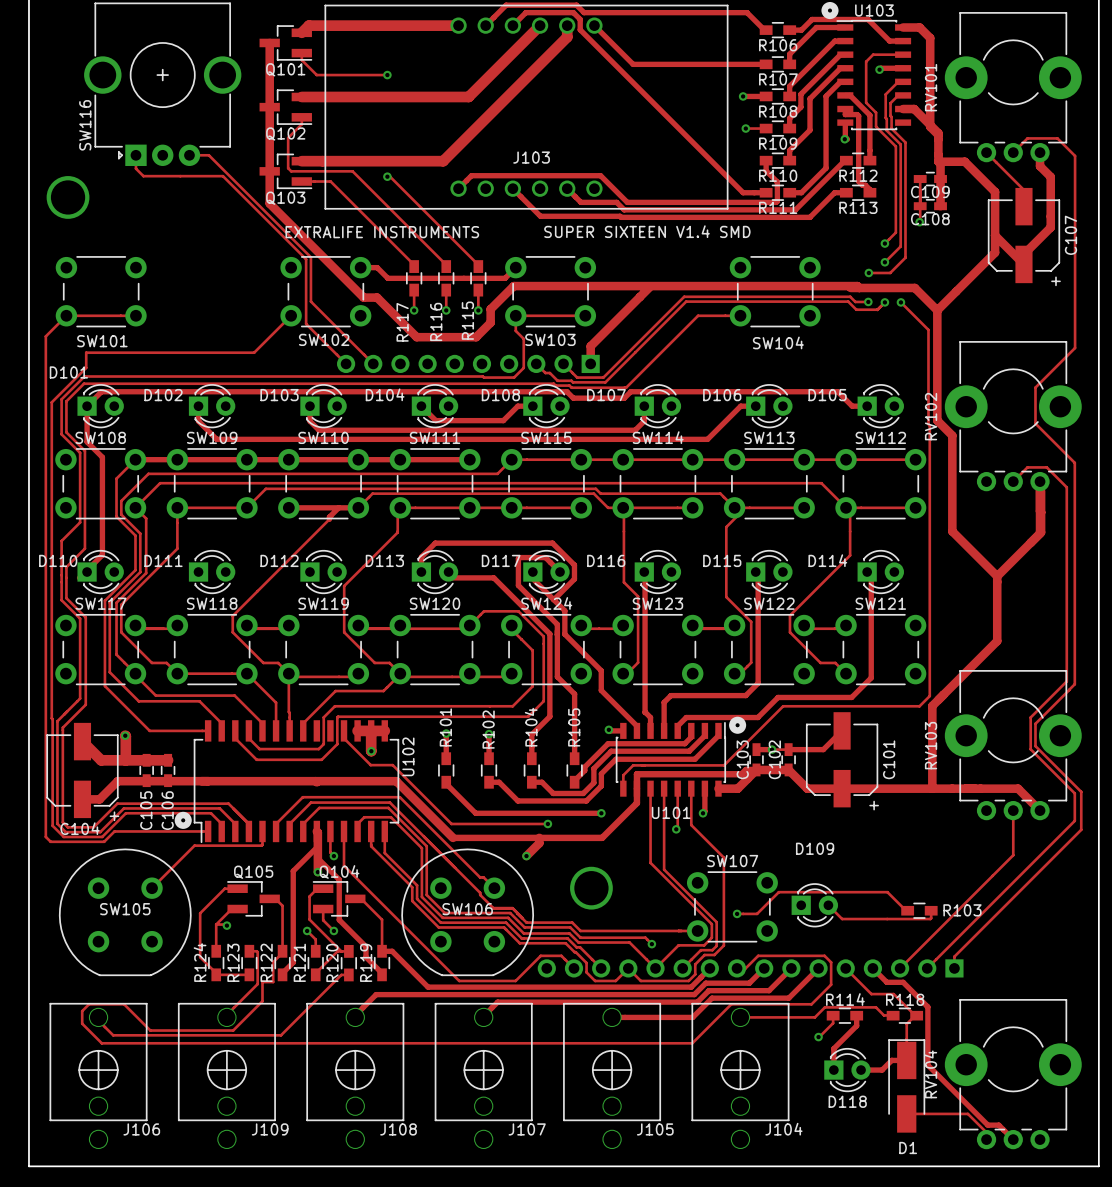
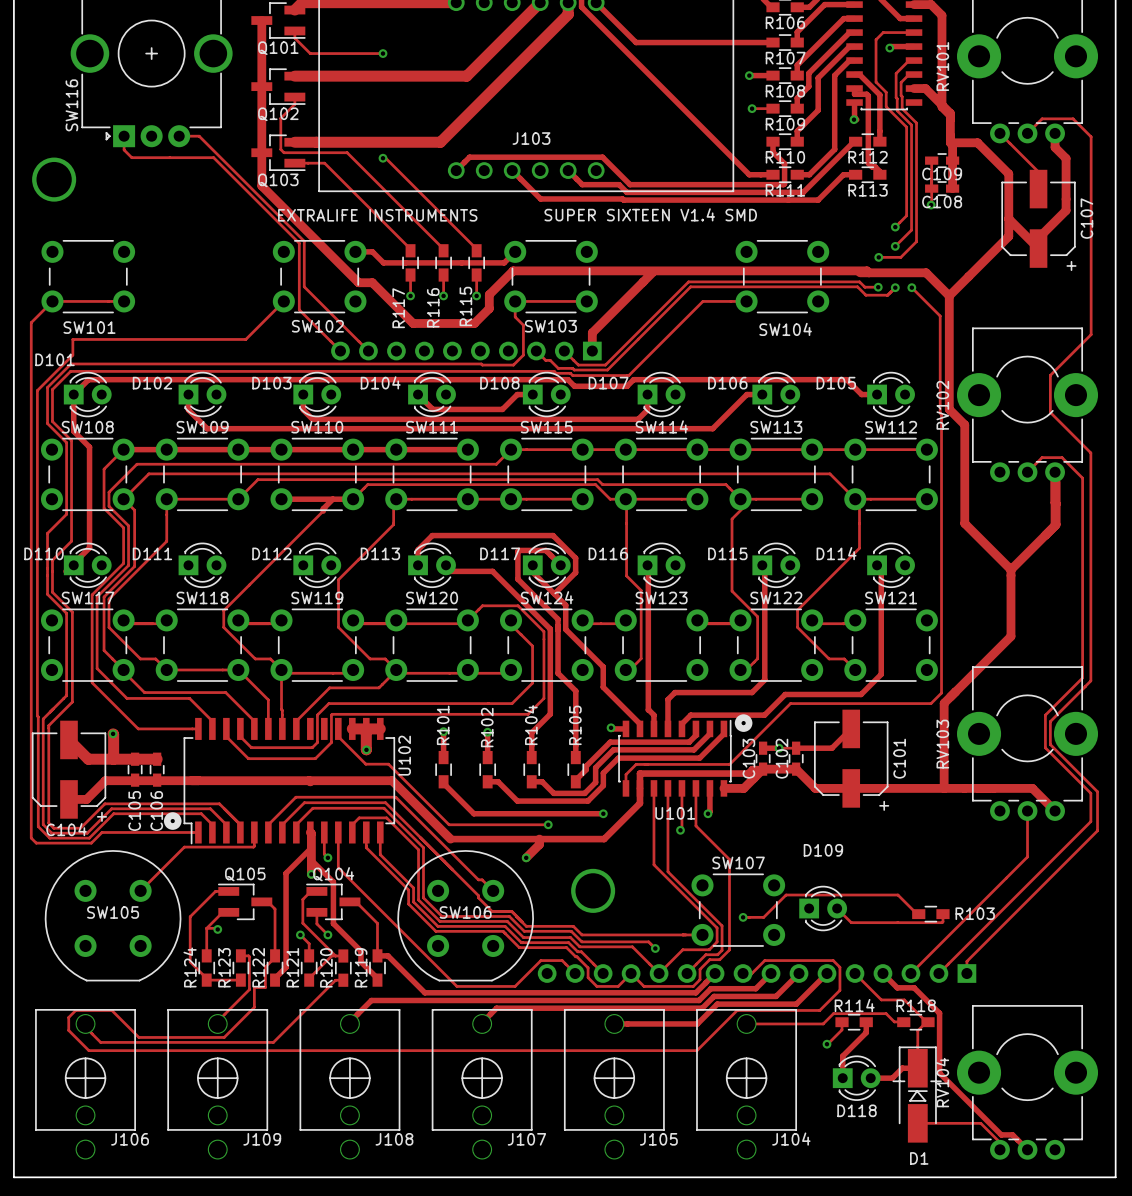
line: none -> (893, 1081) (904, 1081)
line: none -> (931, 1081) (940, 1081)
line: none -> (908, 1091) (926, 1091)
line: none -> (917, 1091) (925, 1100) (910, 1100) (917, 1091)

